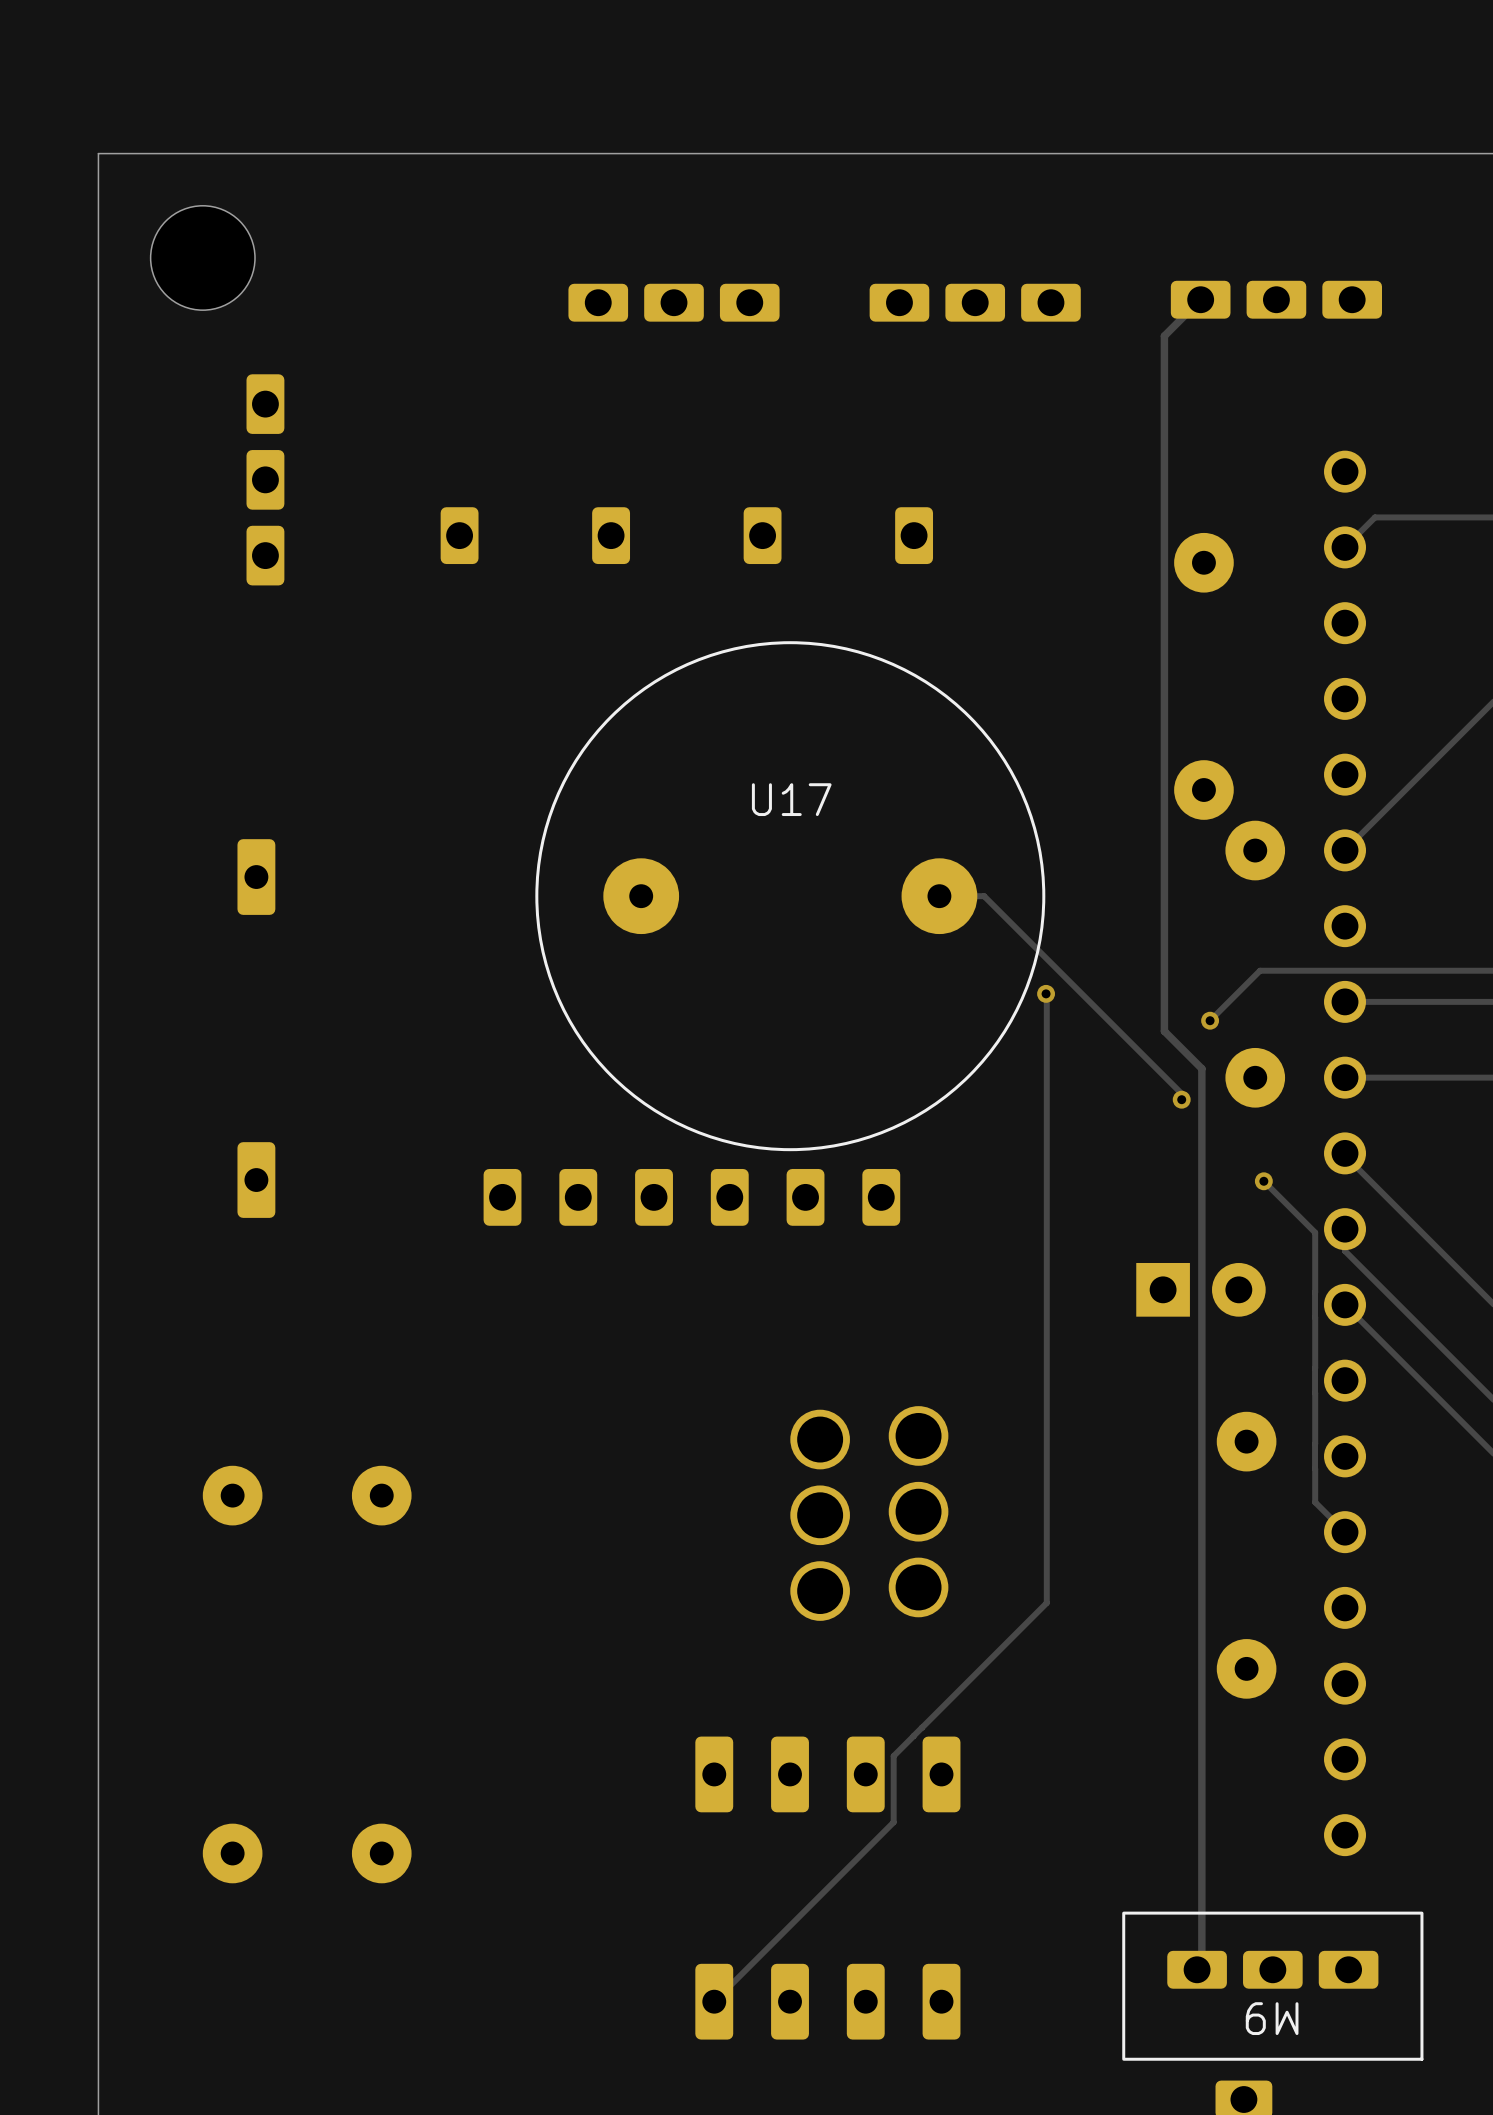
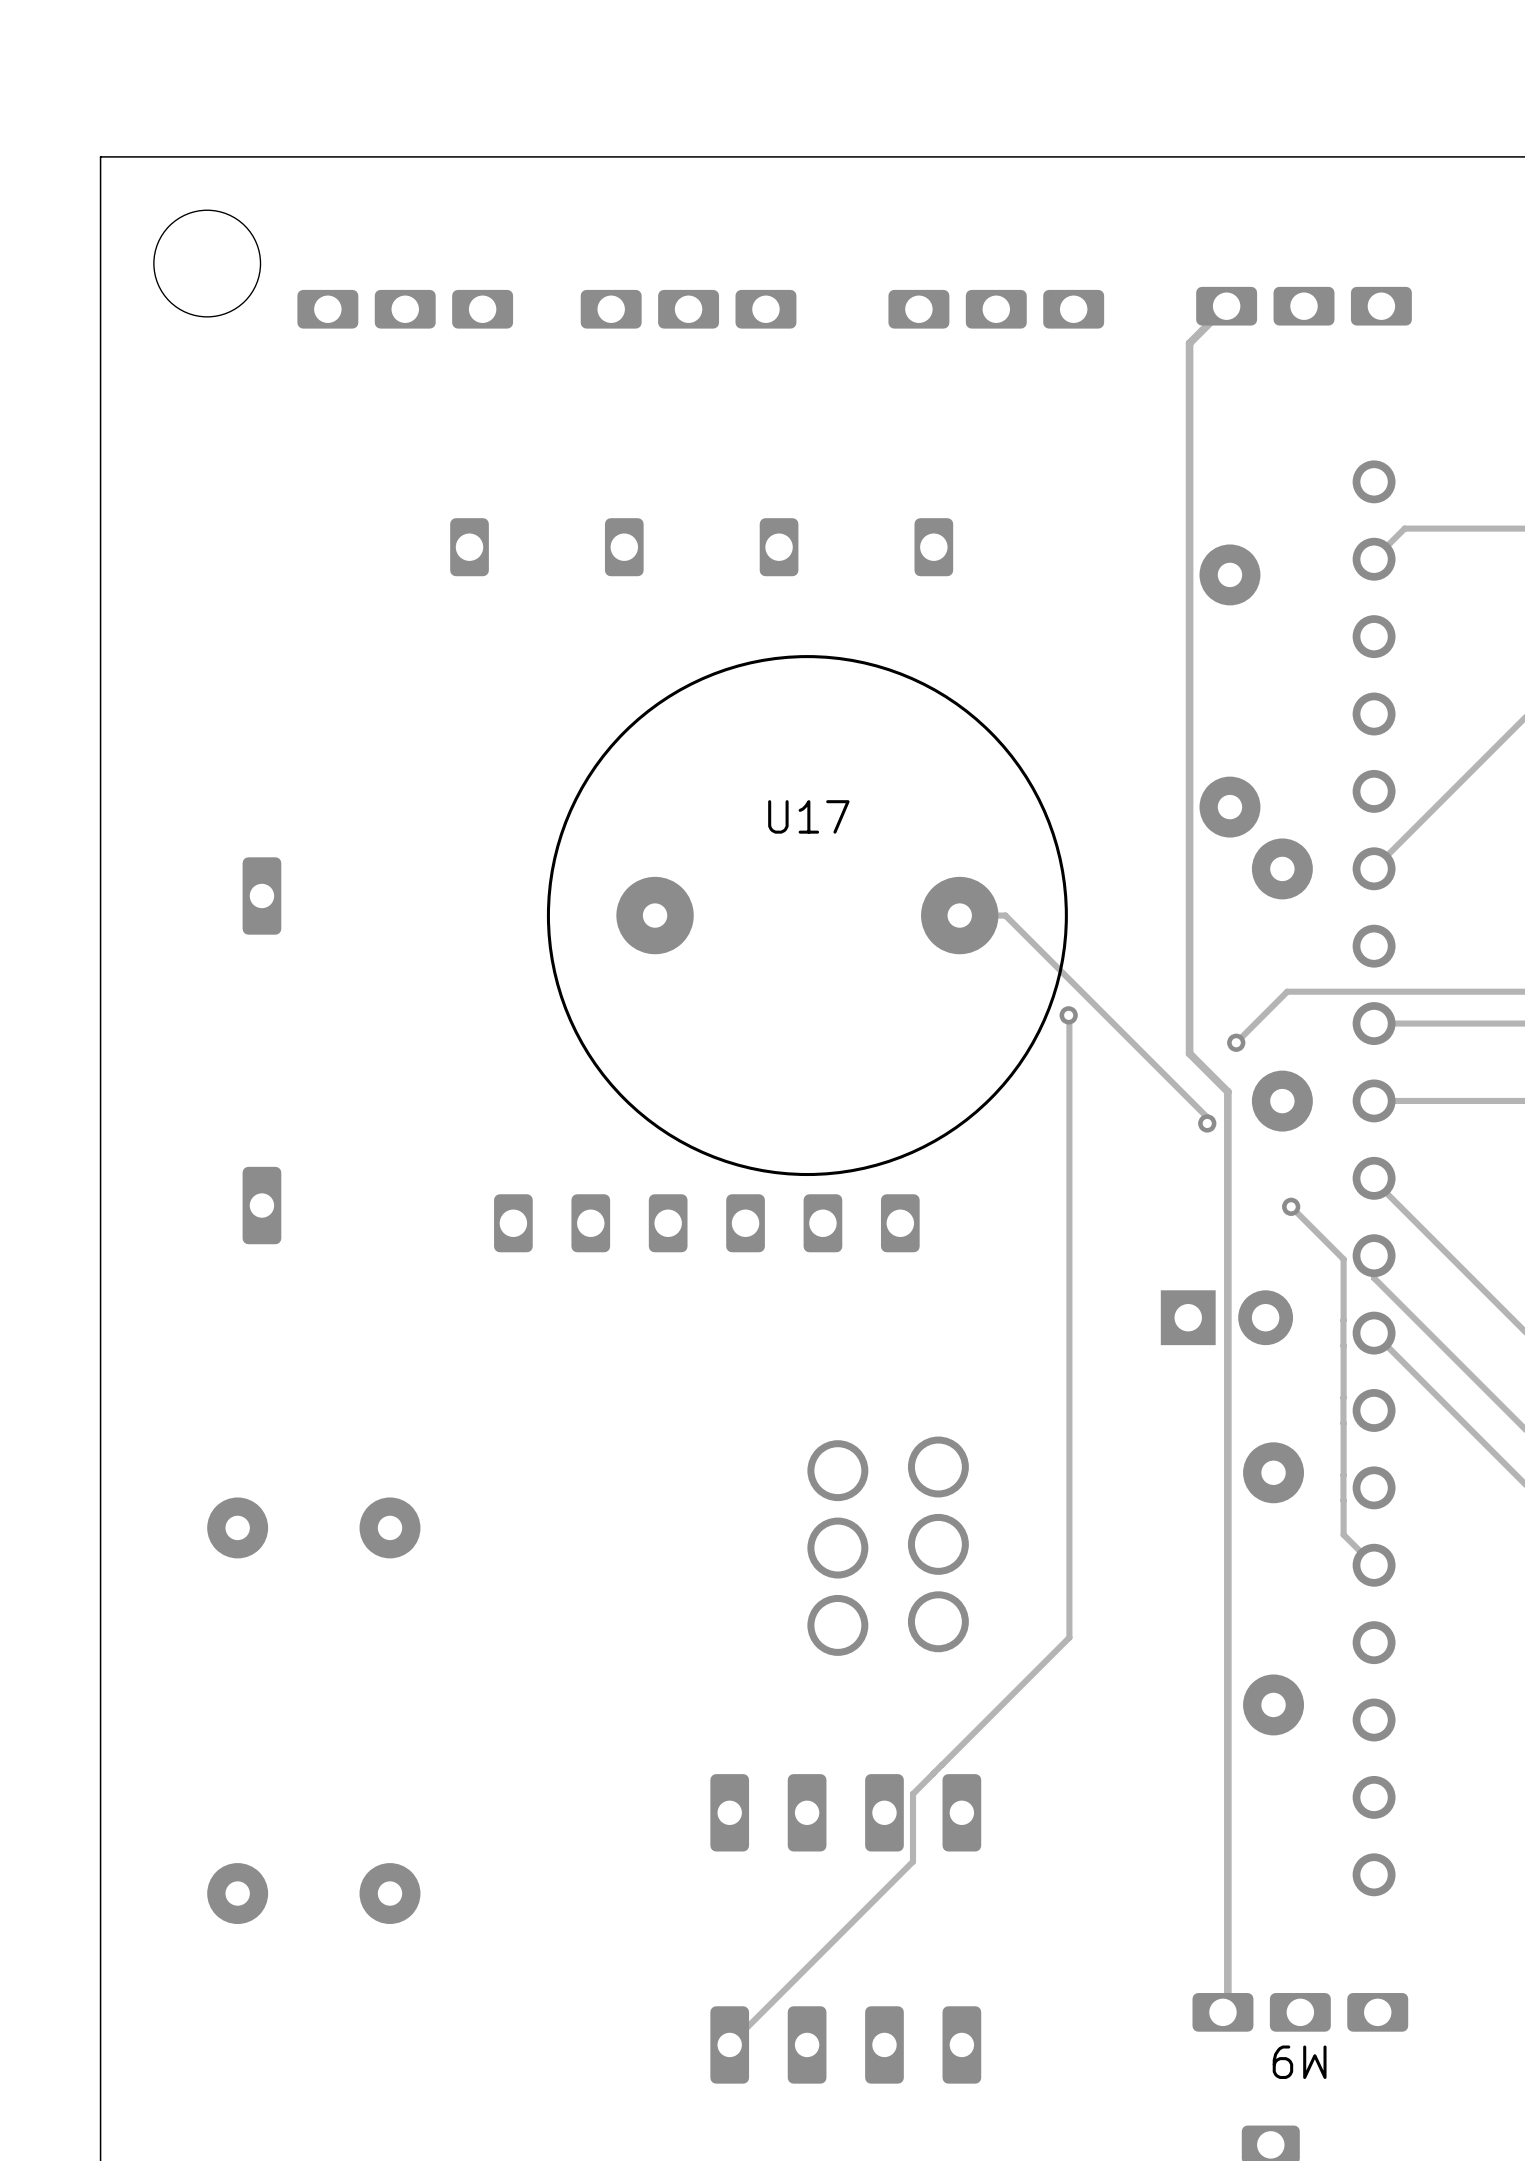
part rotation: 0° (265, 479) -> 90° clockwise (405, 309)
part position: (265, 479) -> (405, 309)
M9 footprint: [1122, 1911, 1424, 2061] -> [1192, 1993, 1409, 2032]

